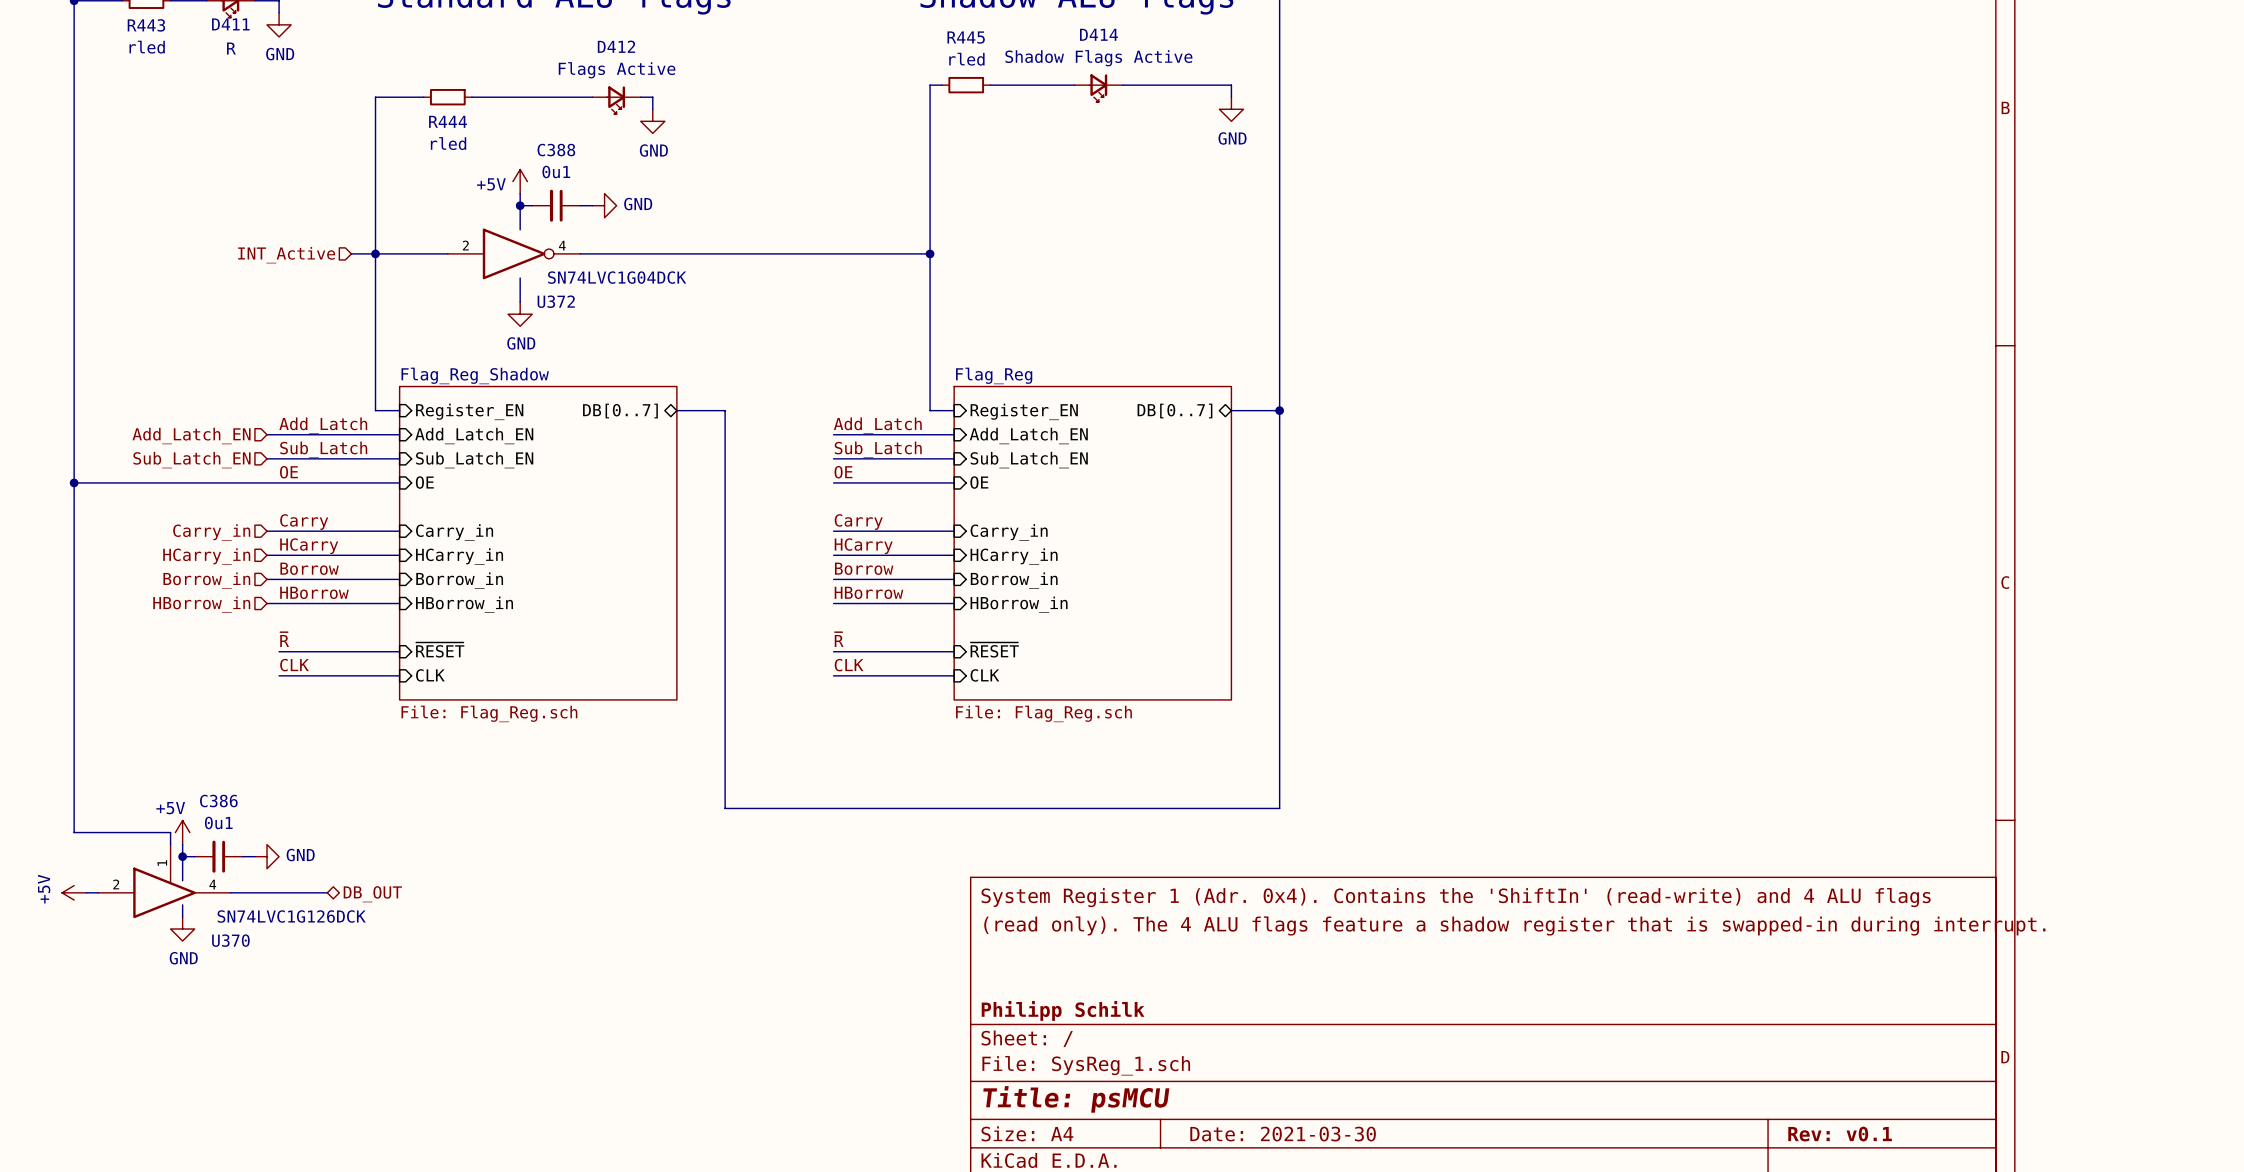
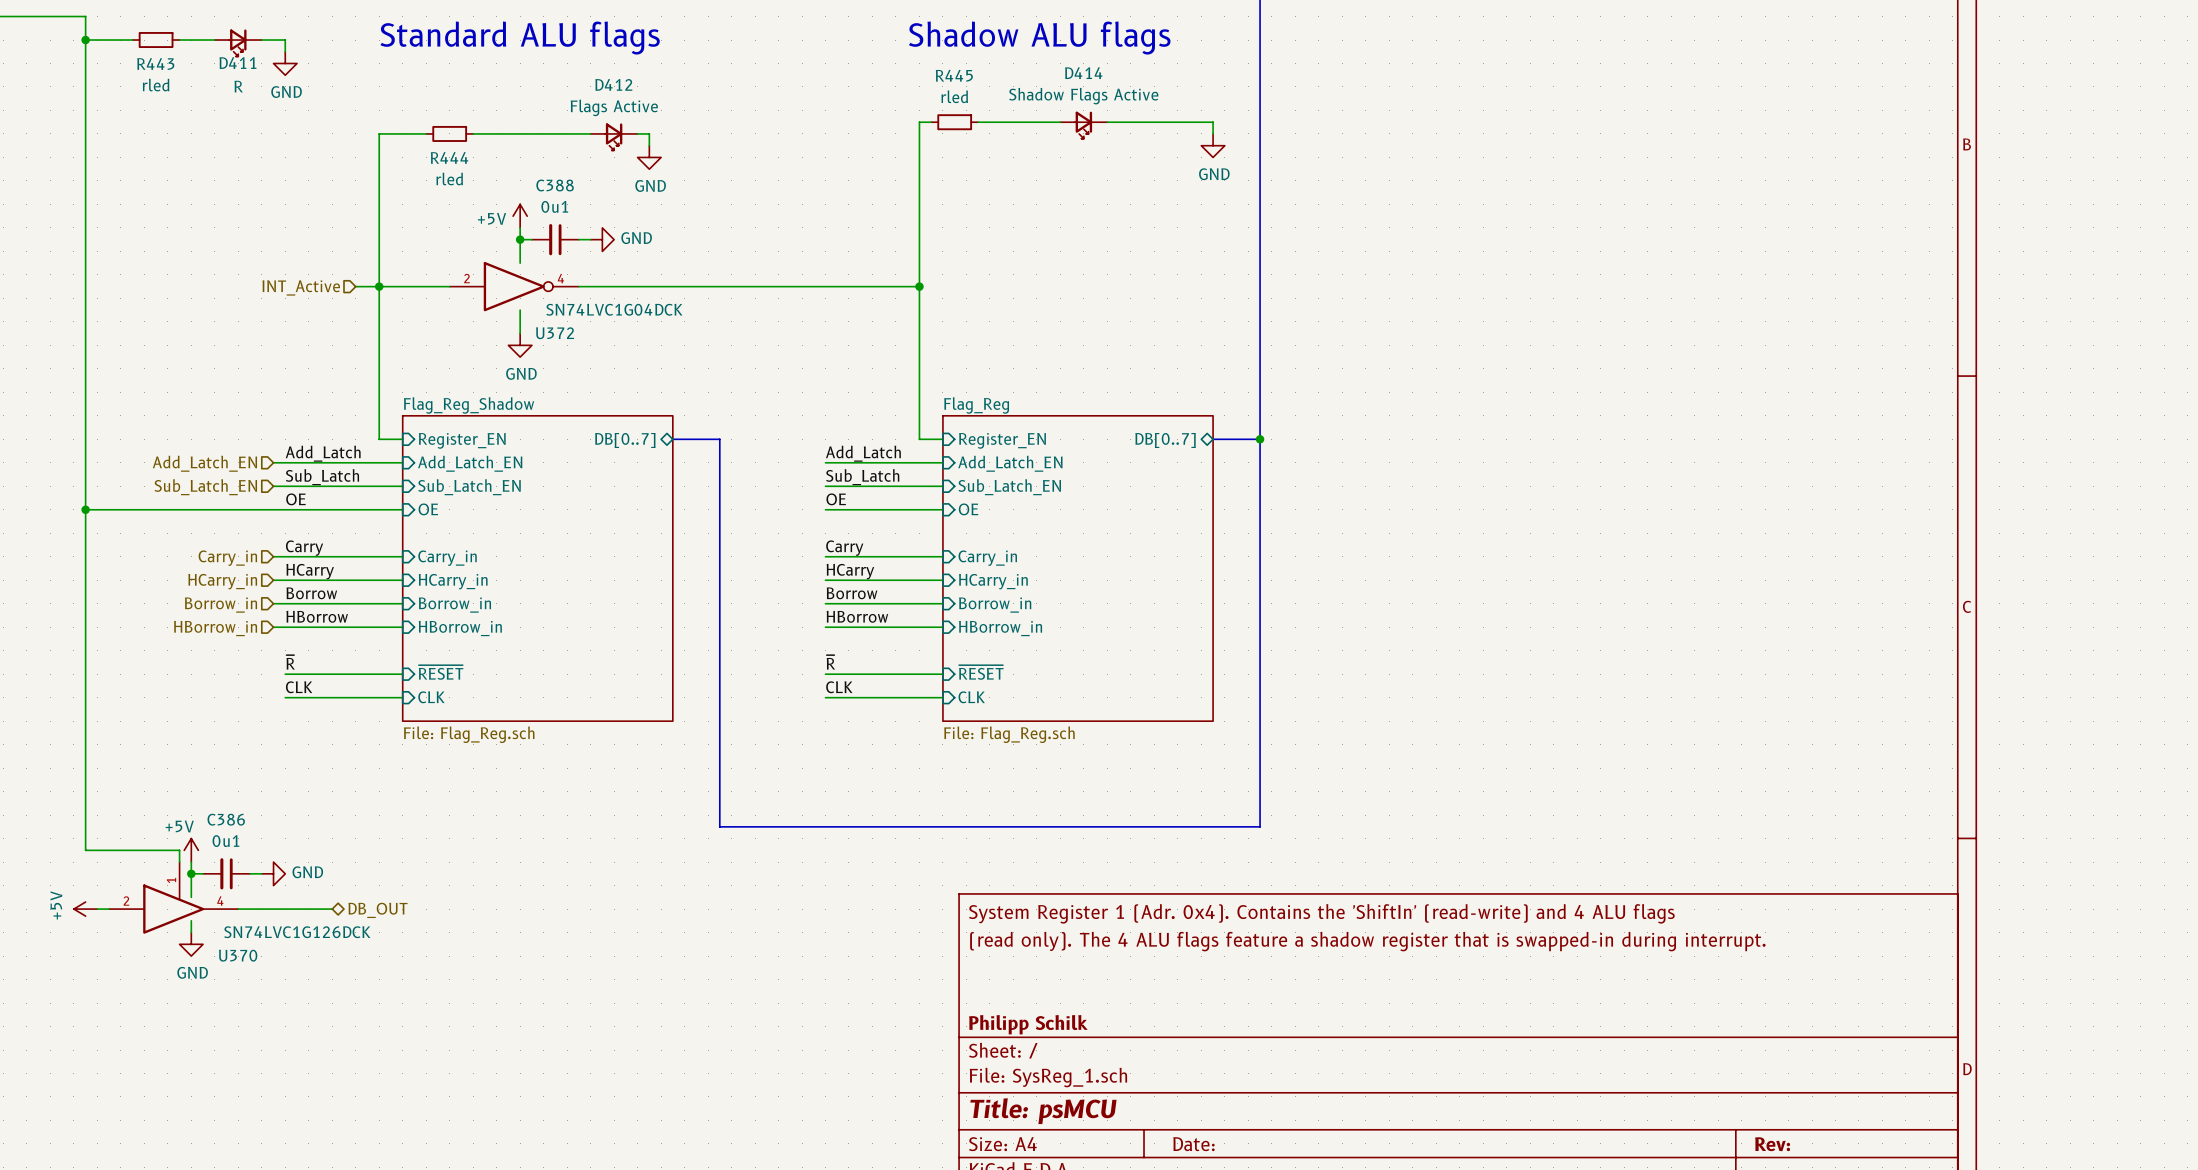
title block: Date: 2021-03-30 (1283, 1134) -> Date: (1193, 1144)
title block: Rev: v0.1 (1840, 1134) -> Rev: (1772, 1144)

